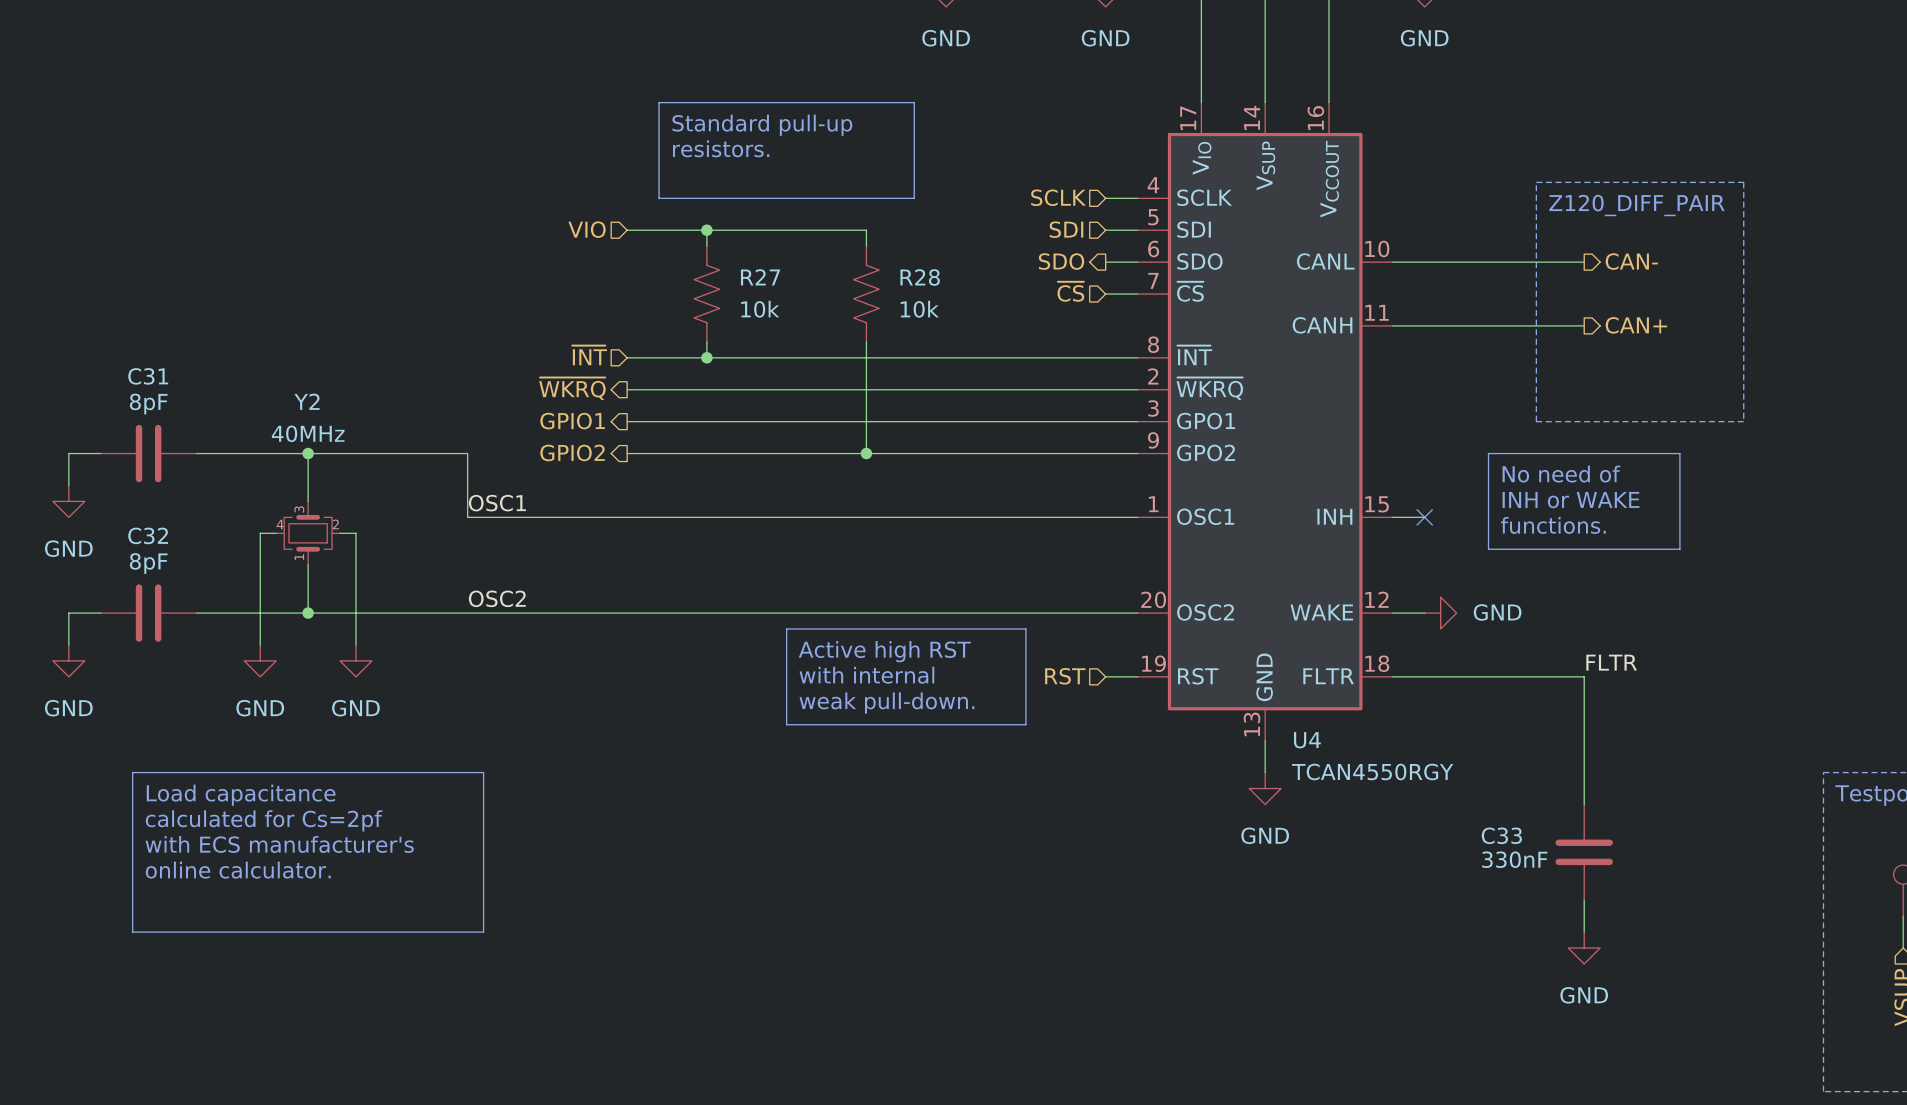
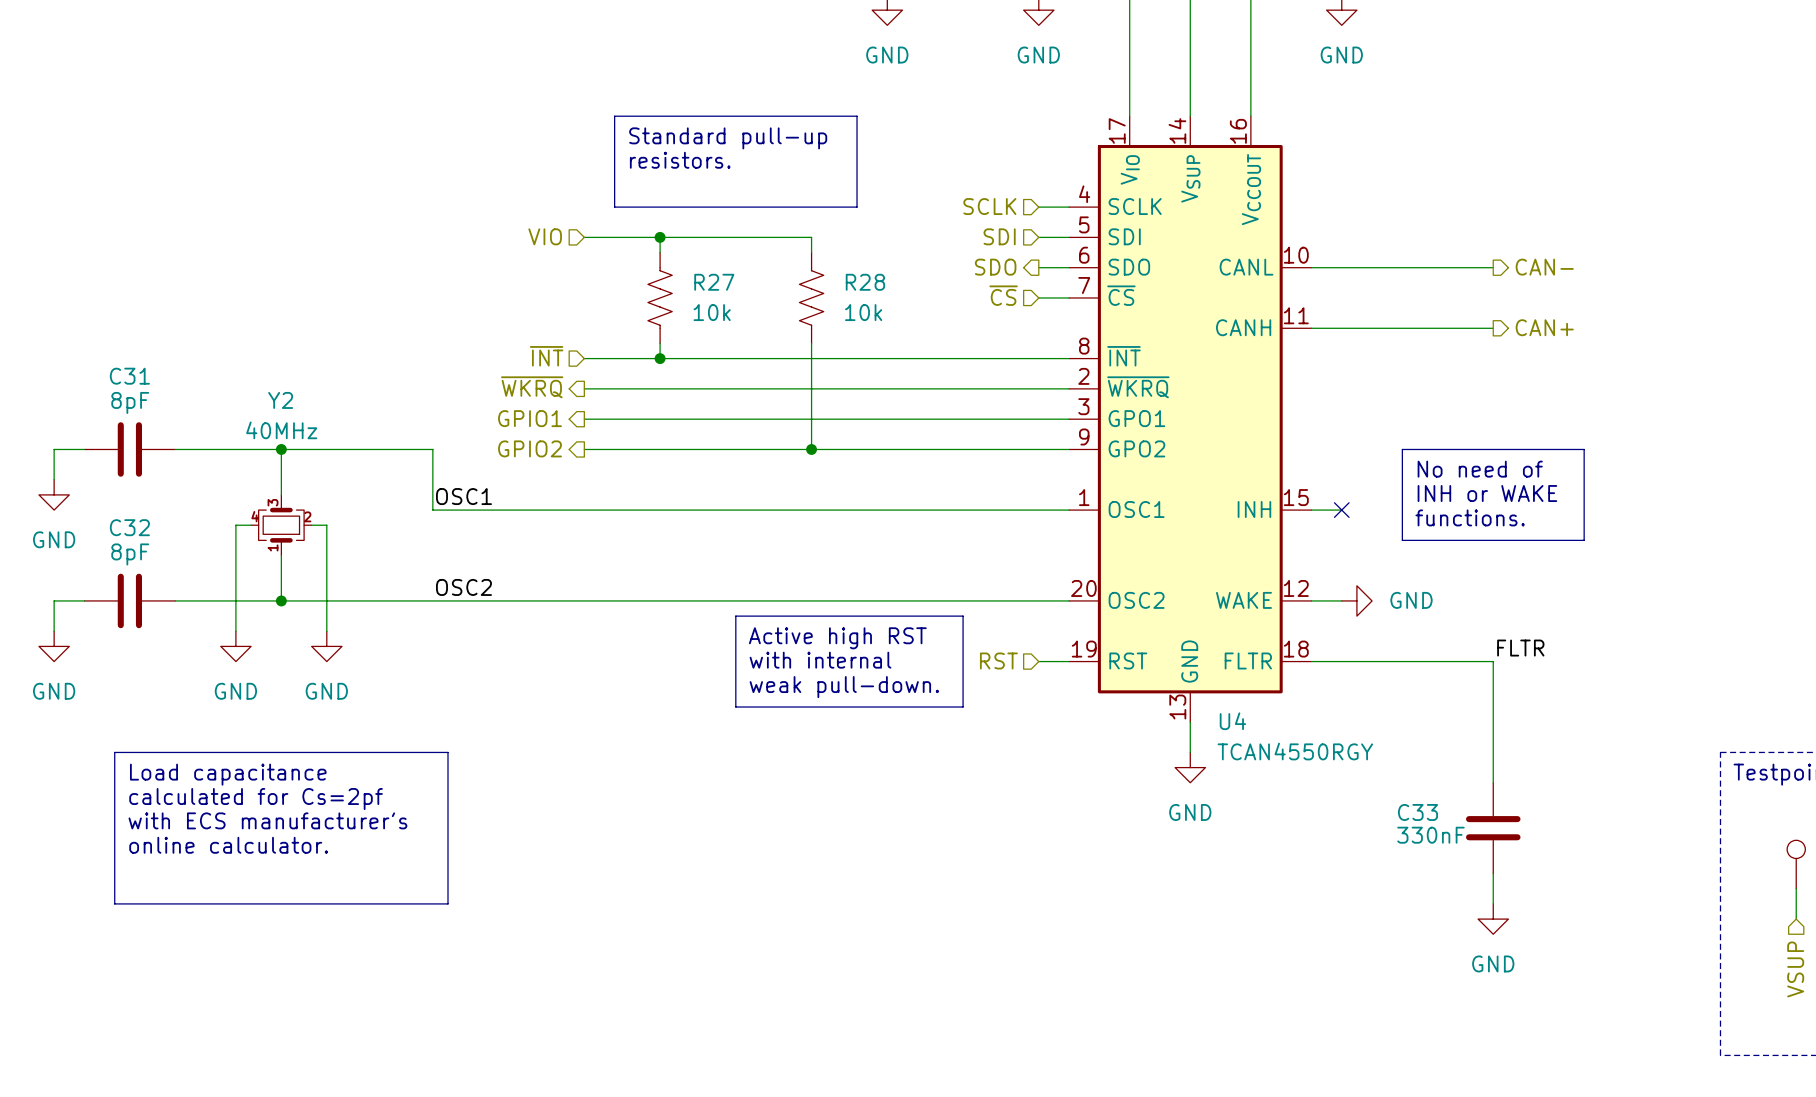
line: (1536, 182) (1743, 182) (1743, 421) (1536, 421) (1536, 182) -> none
text: Z120_DIFF_PAIR (1636, 205) -> none

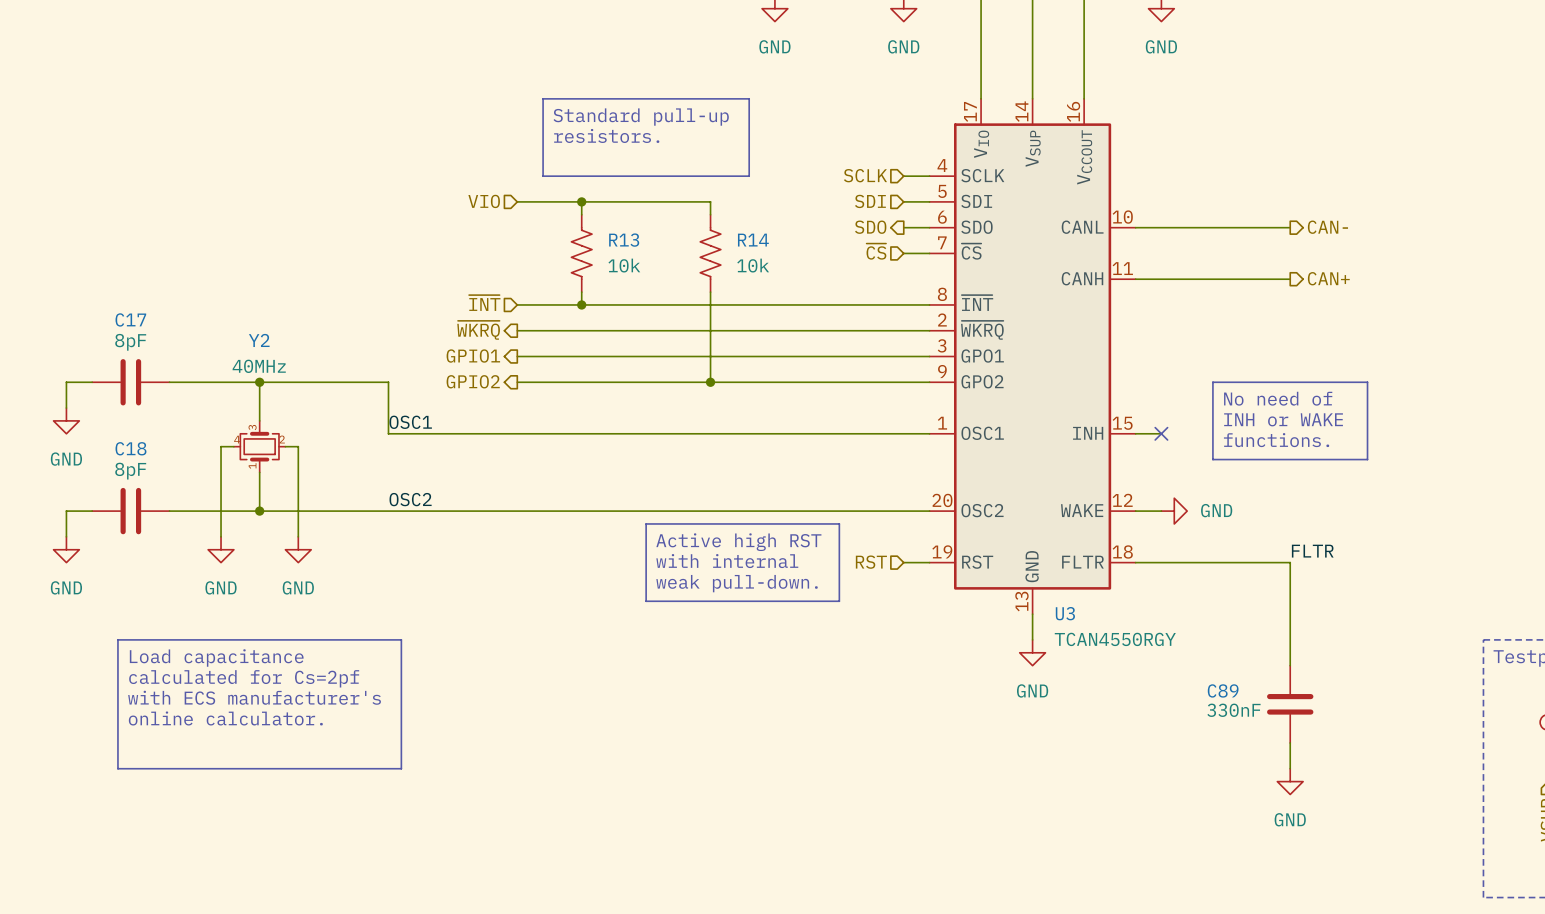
R27 name: R27 (714, 282) -> R13 (624, 240)
R28 name: R28 (865, 282) -> R14 (753, 240)
C31 name: C31 (129, 376) -> C17 (130, 319)
C32 name: C32 (129, 527) -> C18 (130, 448)
U4 name: U4 (1232, 721) -> U3 (1065, 613)
C33 name: C33 (1417, 812) -> C89 (1223, 690)

